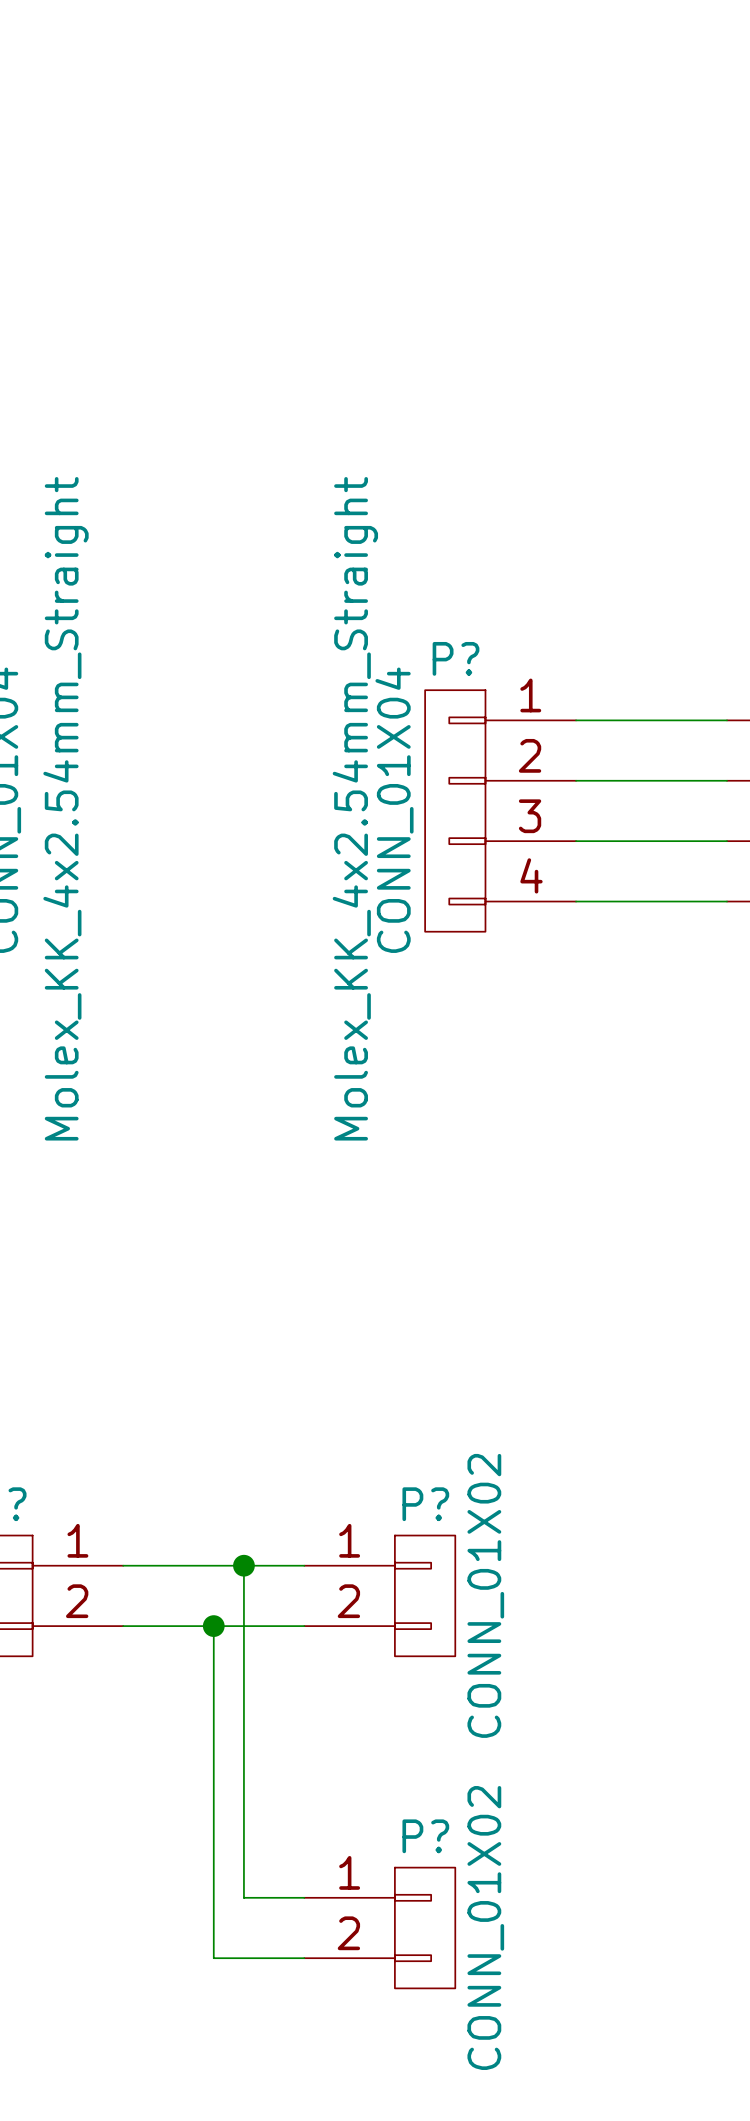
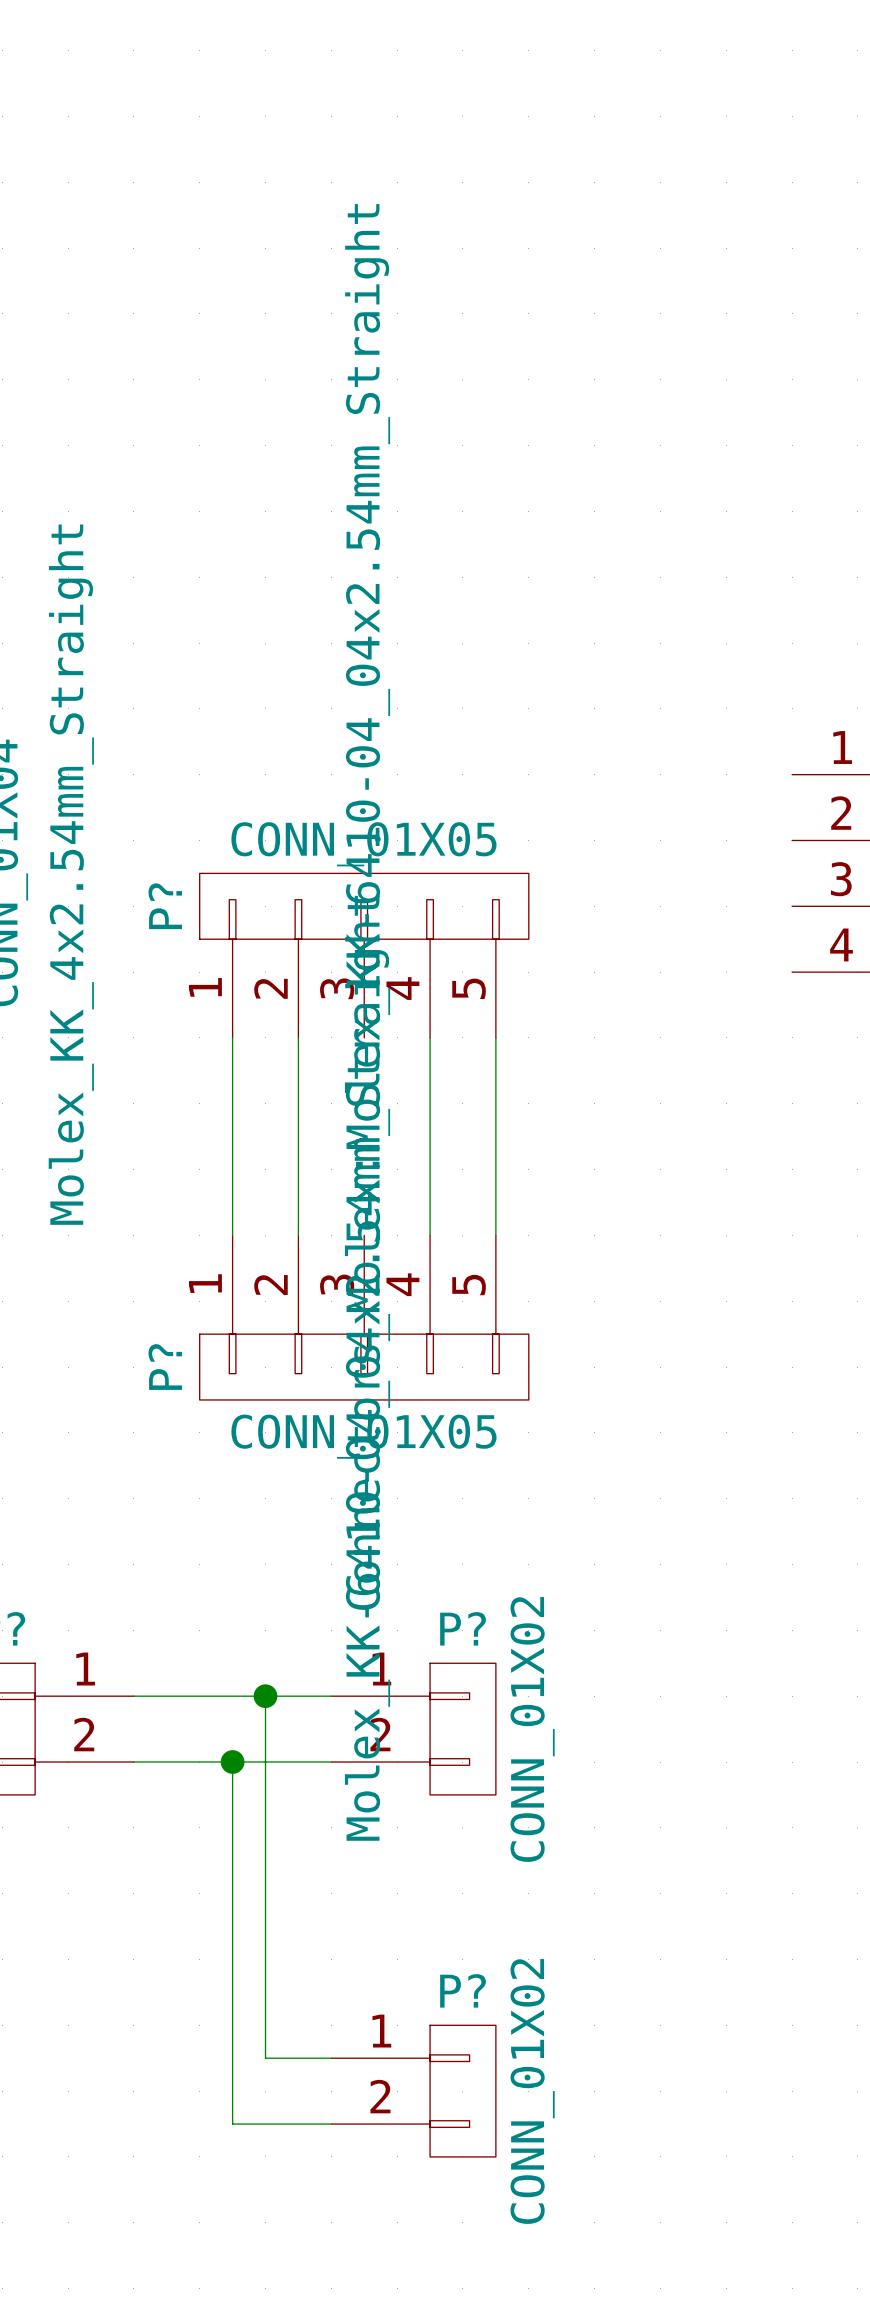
wire: (576, 720) (727, 720) -> none
wire: (576, 780) (727, 780) -> none
P?: CONN_01X04 (500, 810) -> none
wire: (576, 841) (727, 841) -> none
P?: none -> CONN_01X05 (364, 955)
wire: (576, 901) (727, 901) -> none
wire: none -> (232, 1037) (232, 1235)
wire: none -> (298, 1037) (298, 1235)
wire: none -> (430, 1037) (430, 1235)
wire: none -> (495, 1037) (495, 1235)
P?: none -> CONN_01X05 (364, 1317)

